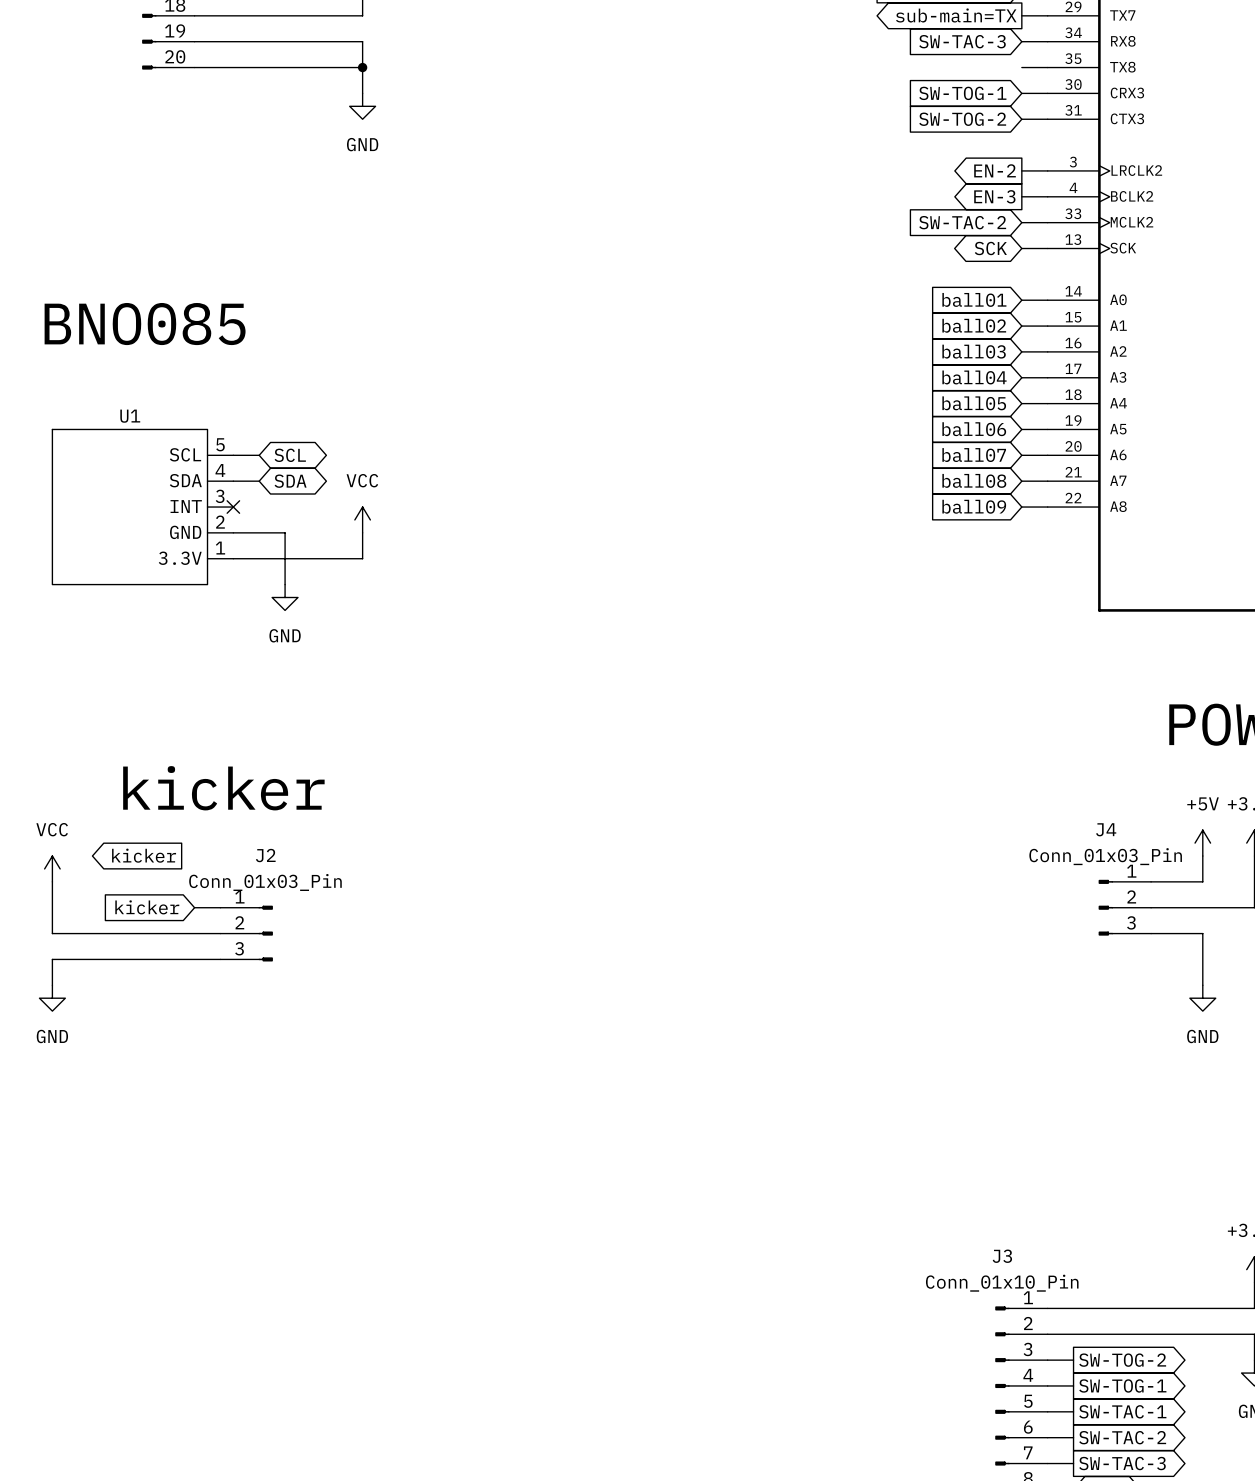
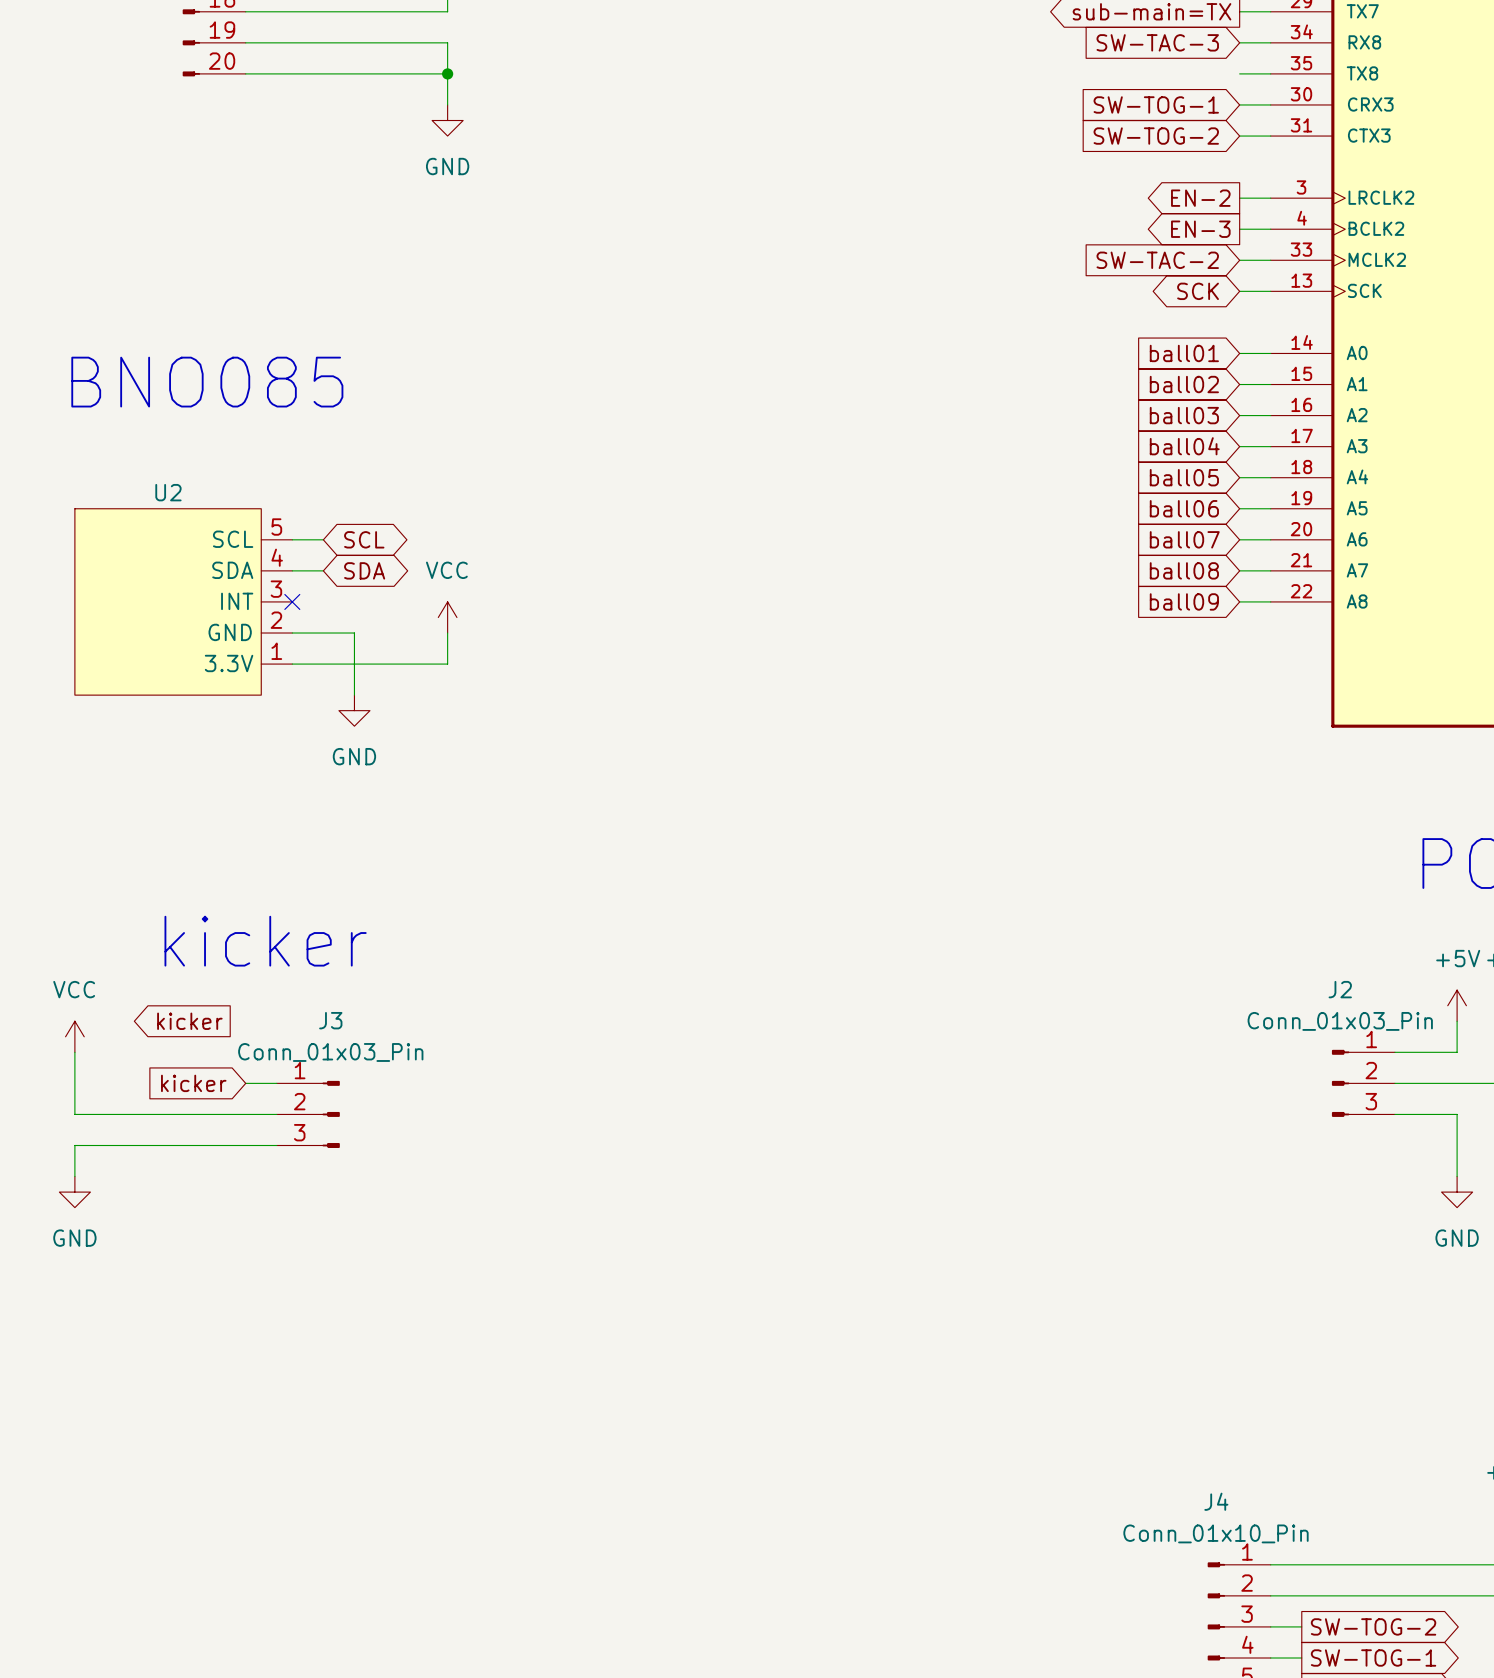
U1 name: U1 (130, 416) -> U2 (168, 492)
J4 name: J4 (1106, 829) -> J2 (1340, 989)
J2 name: J2 (265, 855) -> J3 (330, 1020)
J3 name: J3 (1002, 1256) -> J4 (1216, 1501)

